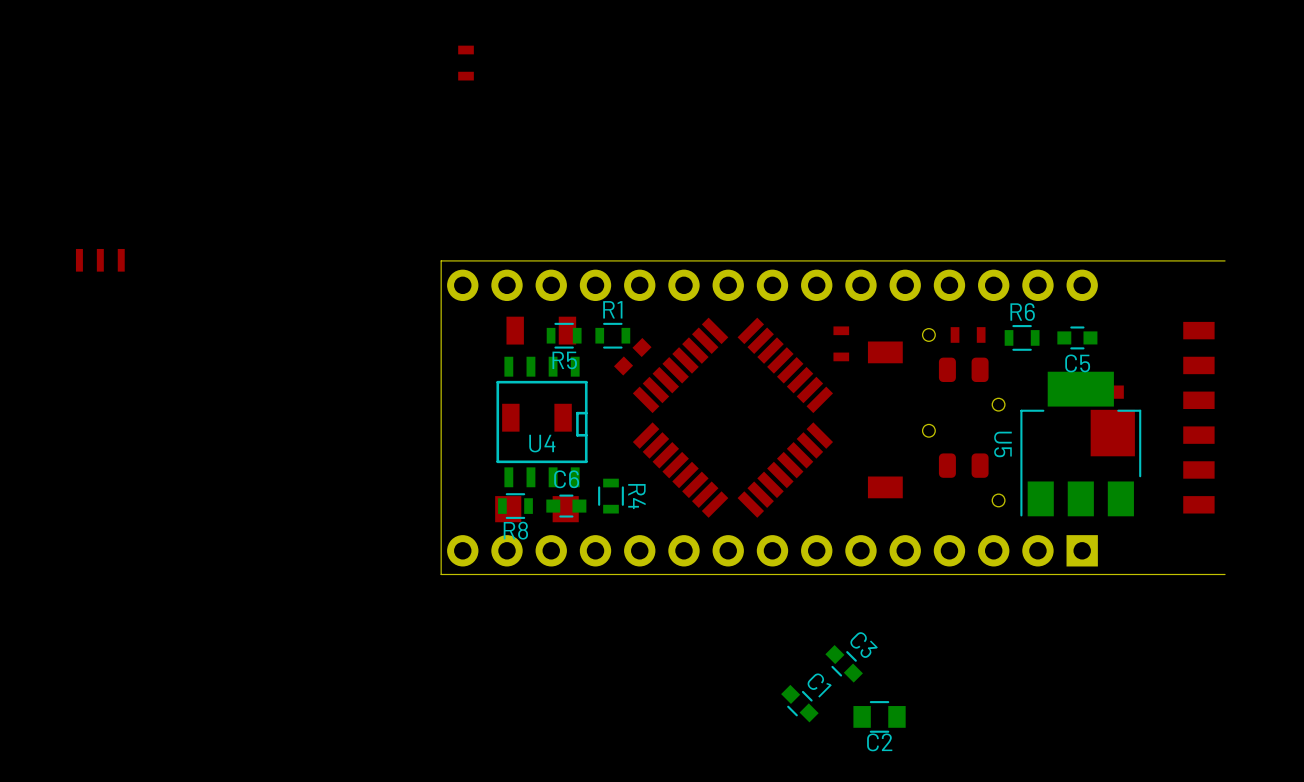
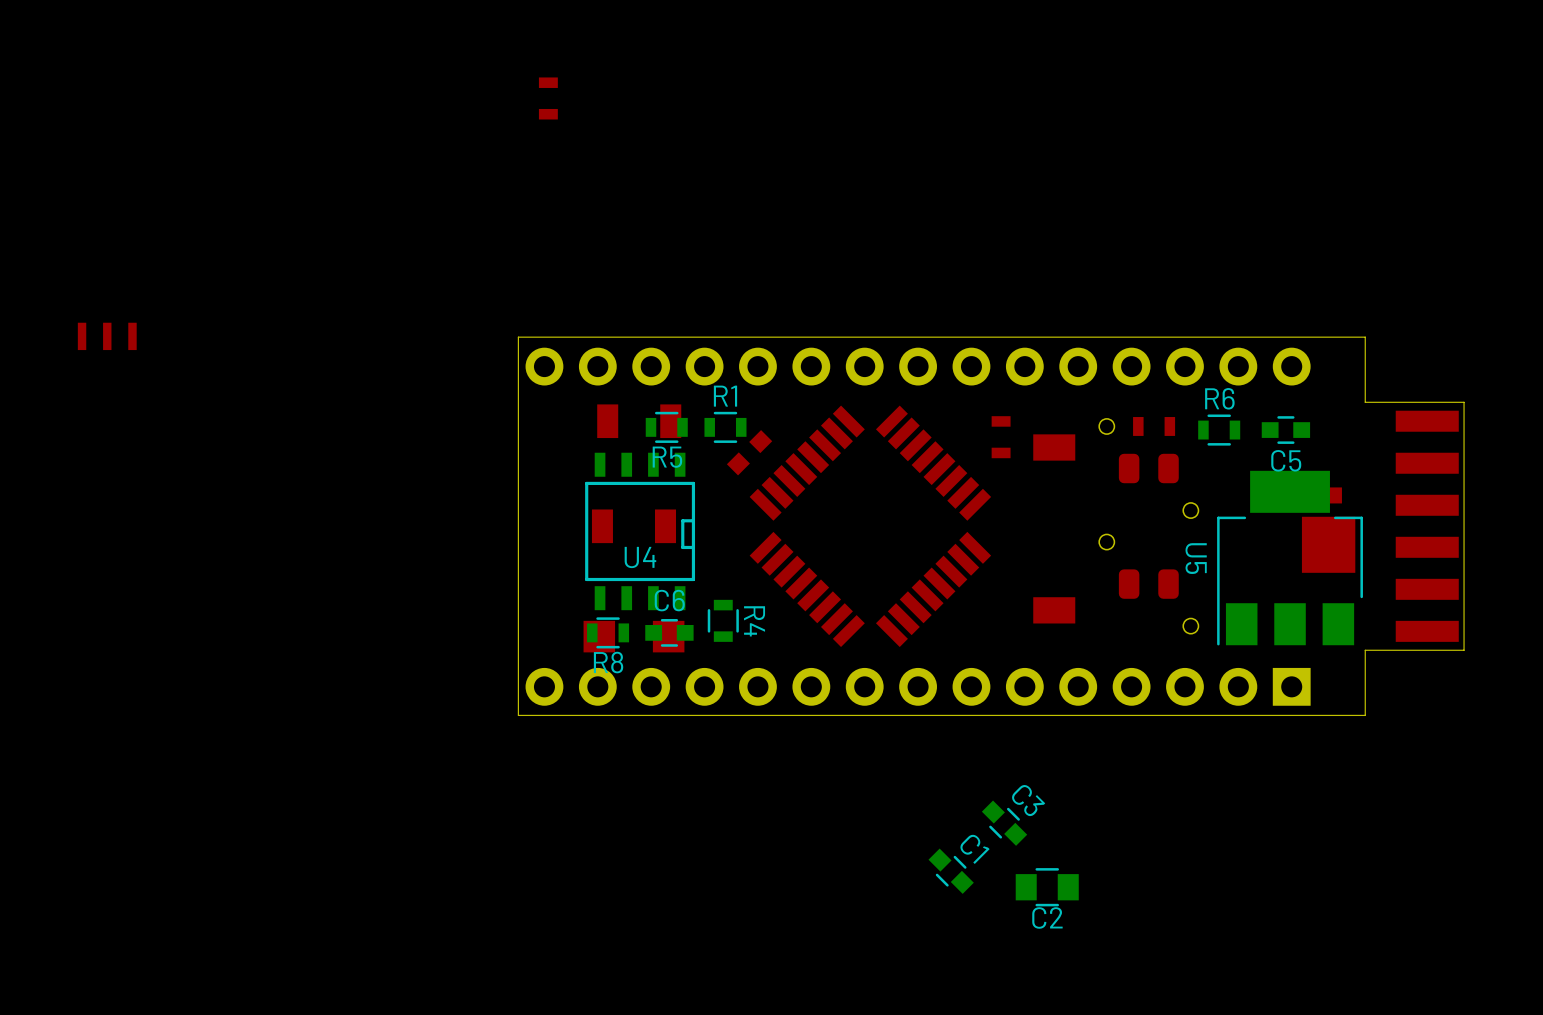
board edge: (1225, 260) (1143, 260) -> (1365, 715) (1365, 650) (1464, 650) (1464, 402) (1365, 402) (1365, 337)
part footprint: [1183, 321, 1215, 514] -> [1395, 410, 1459, 642]
board edge: (1225, 574) (1143, 574) -> none

